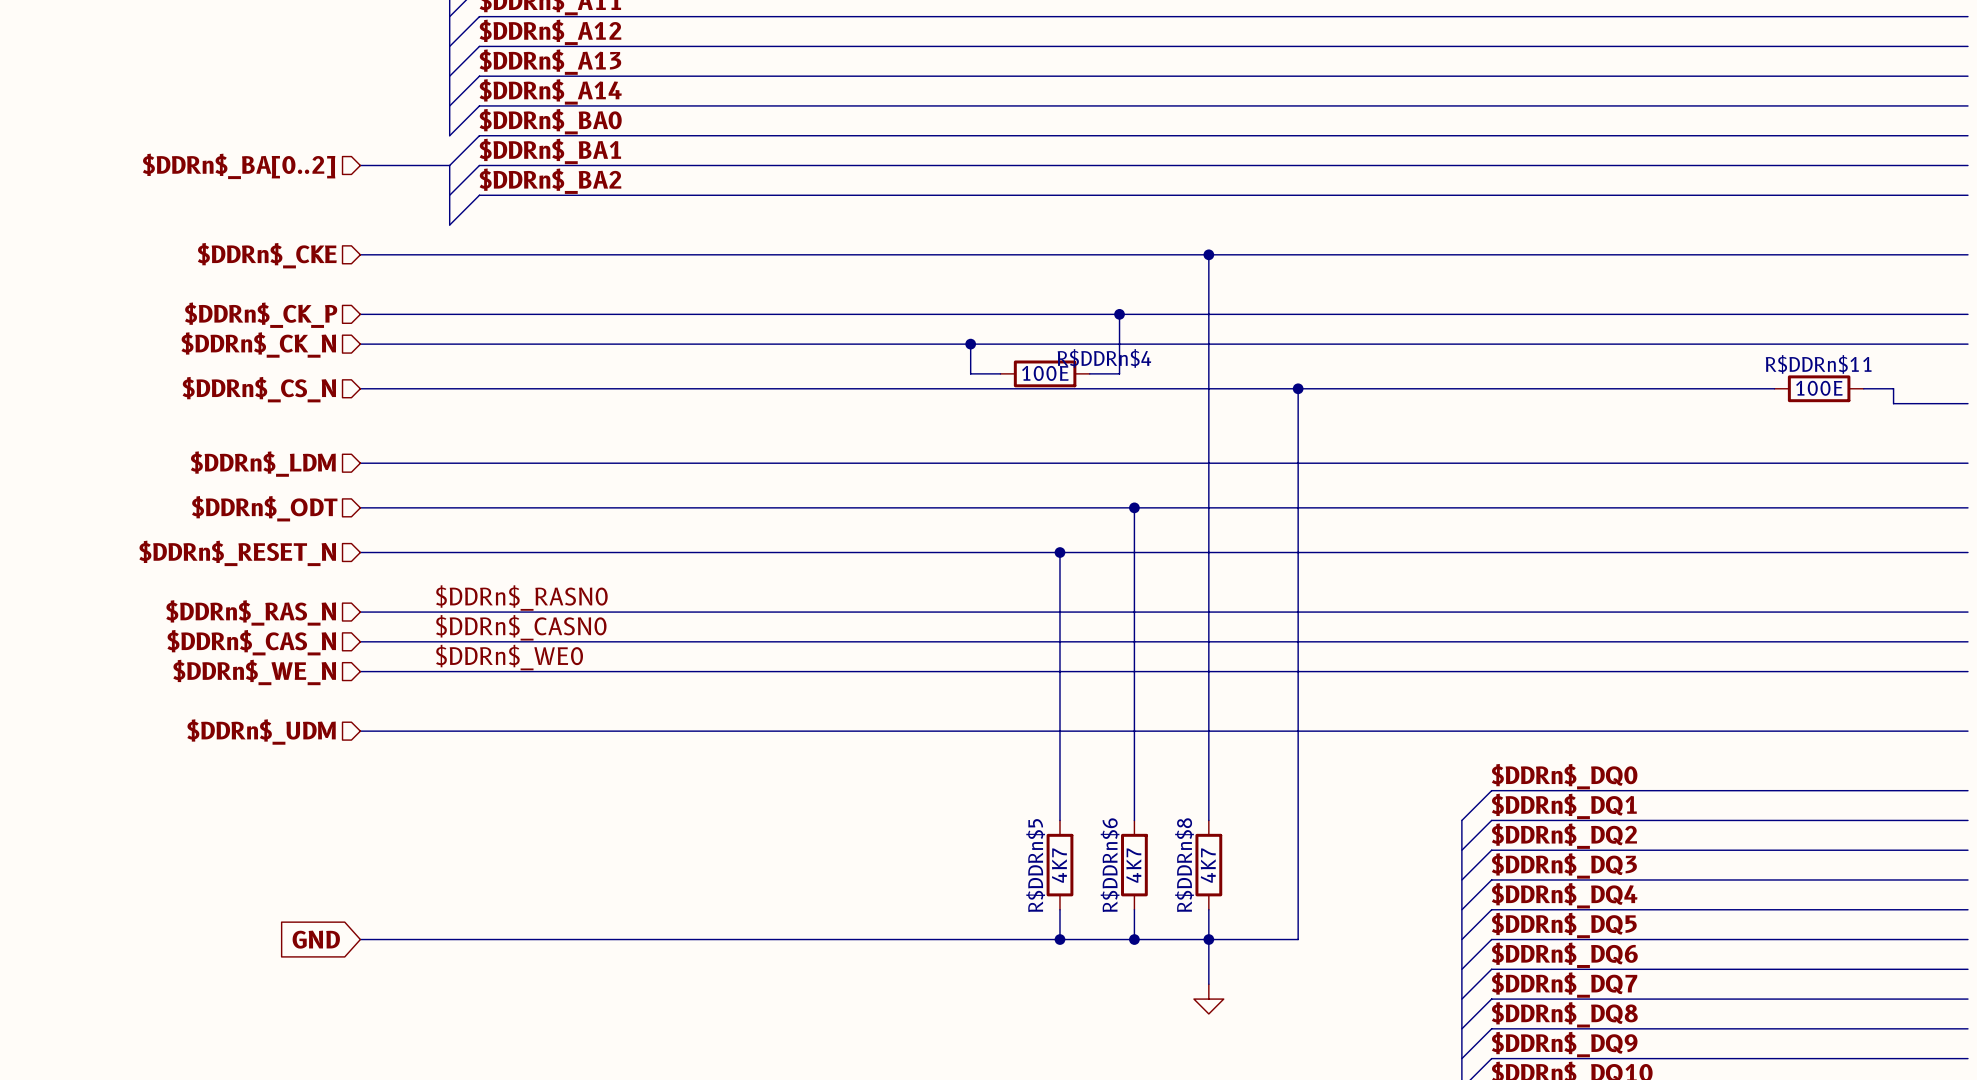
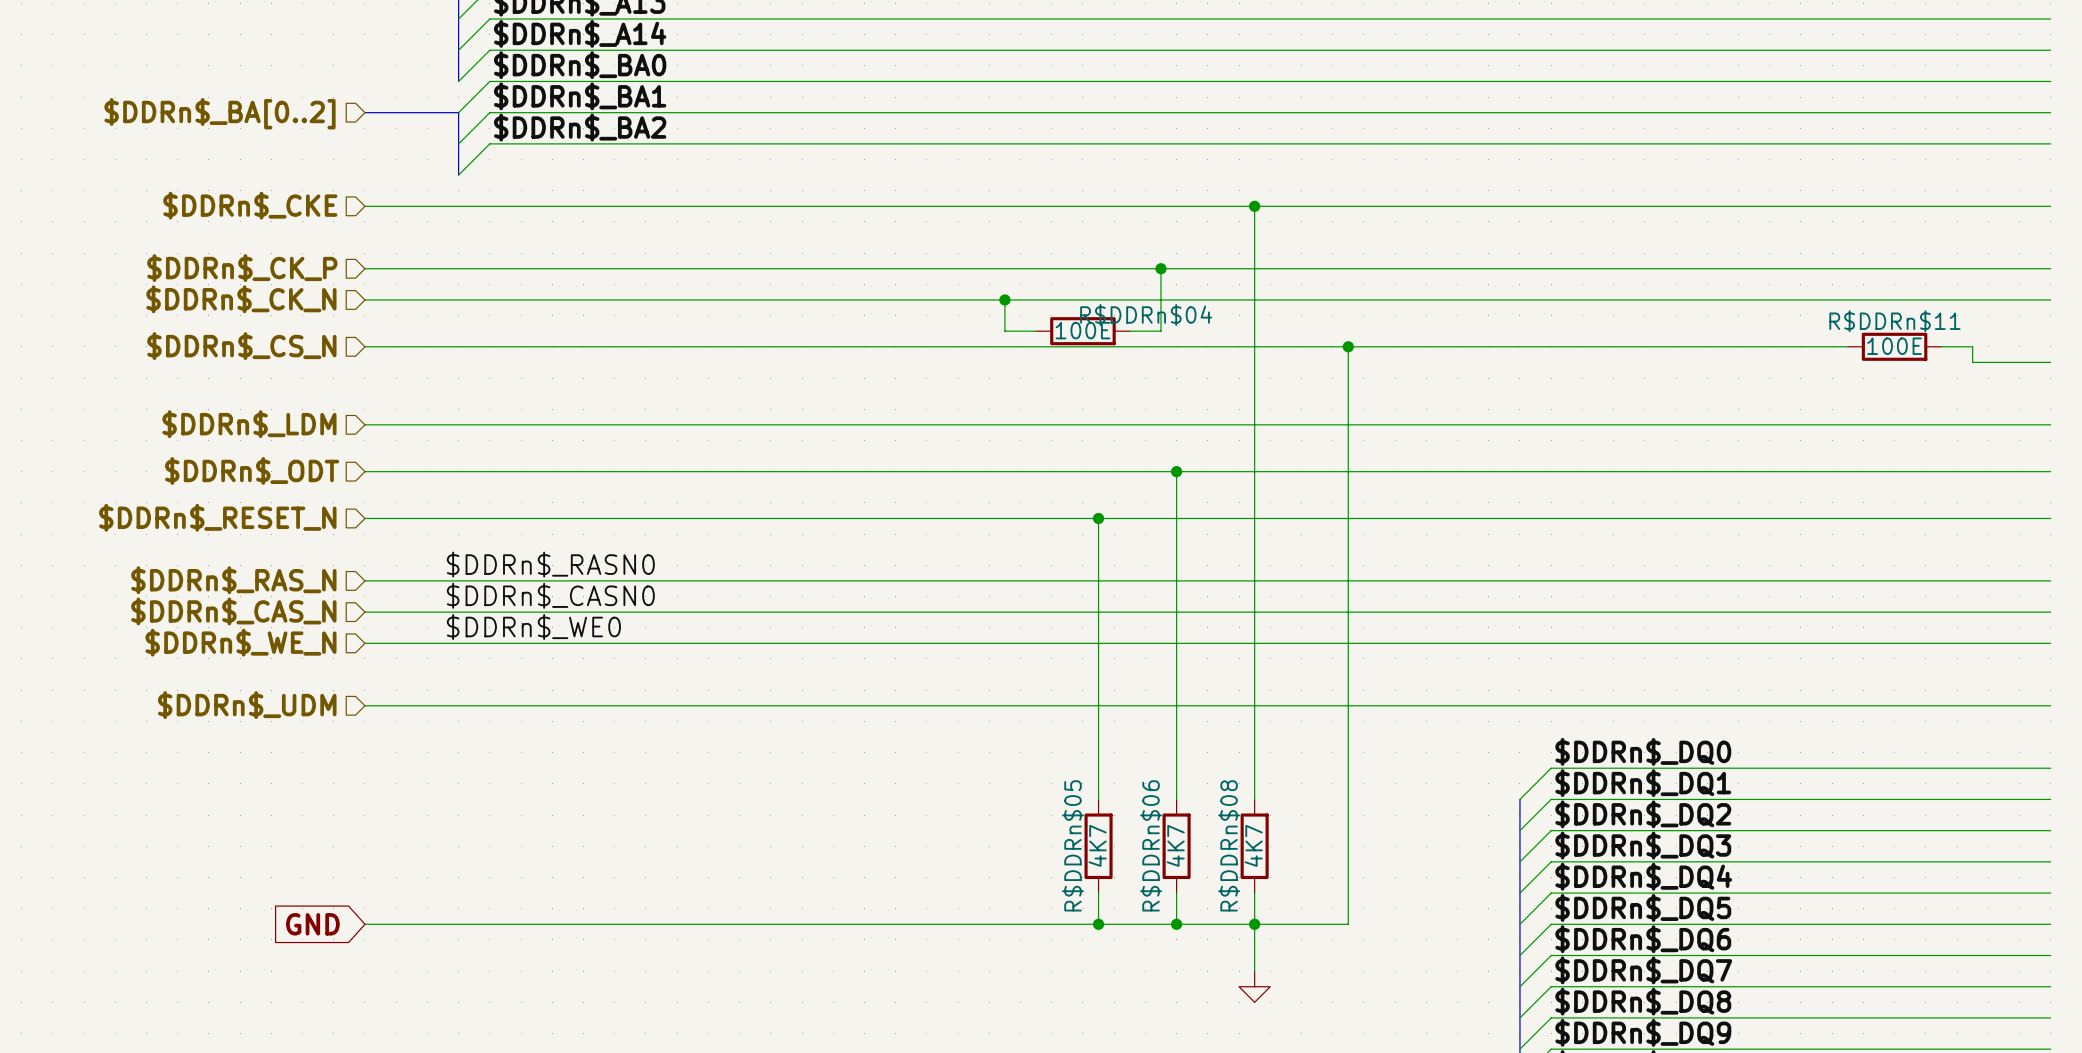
R$DDRn$4 name: R$DDRn$4 (1104, 358) -> R$DDRn$04 (1146, 314)
R$DDRn$5 name: R$DDRn$5 (1035, 865) -> R$DDRn$05 (1073, 845)
R$DDRn$6 name: R$DDRn$6 (1110, 865) -> R$DDRn$06 (1151, 845)
R$DDRn$8 name: R$DDRn$8 (1184, 865) -> R$DDRn$08 (1229, 845)

